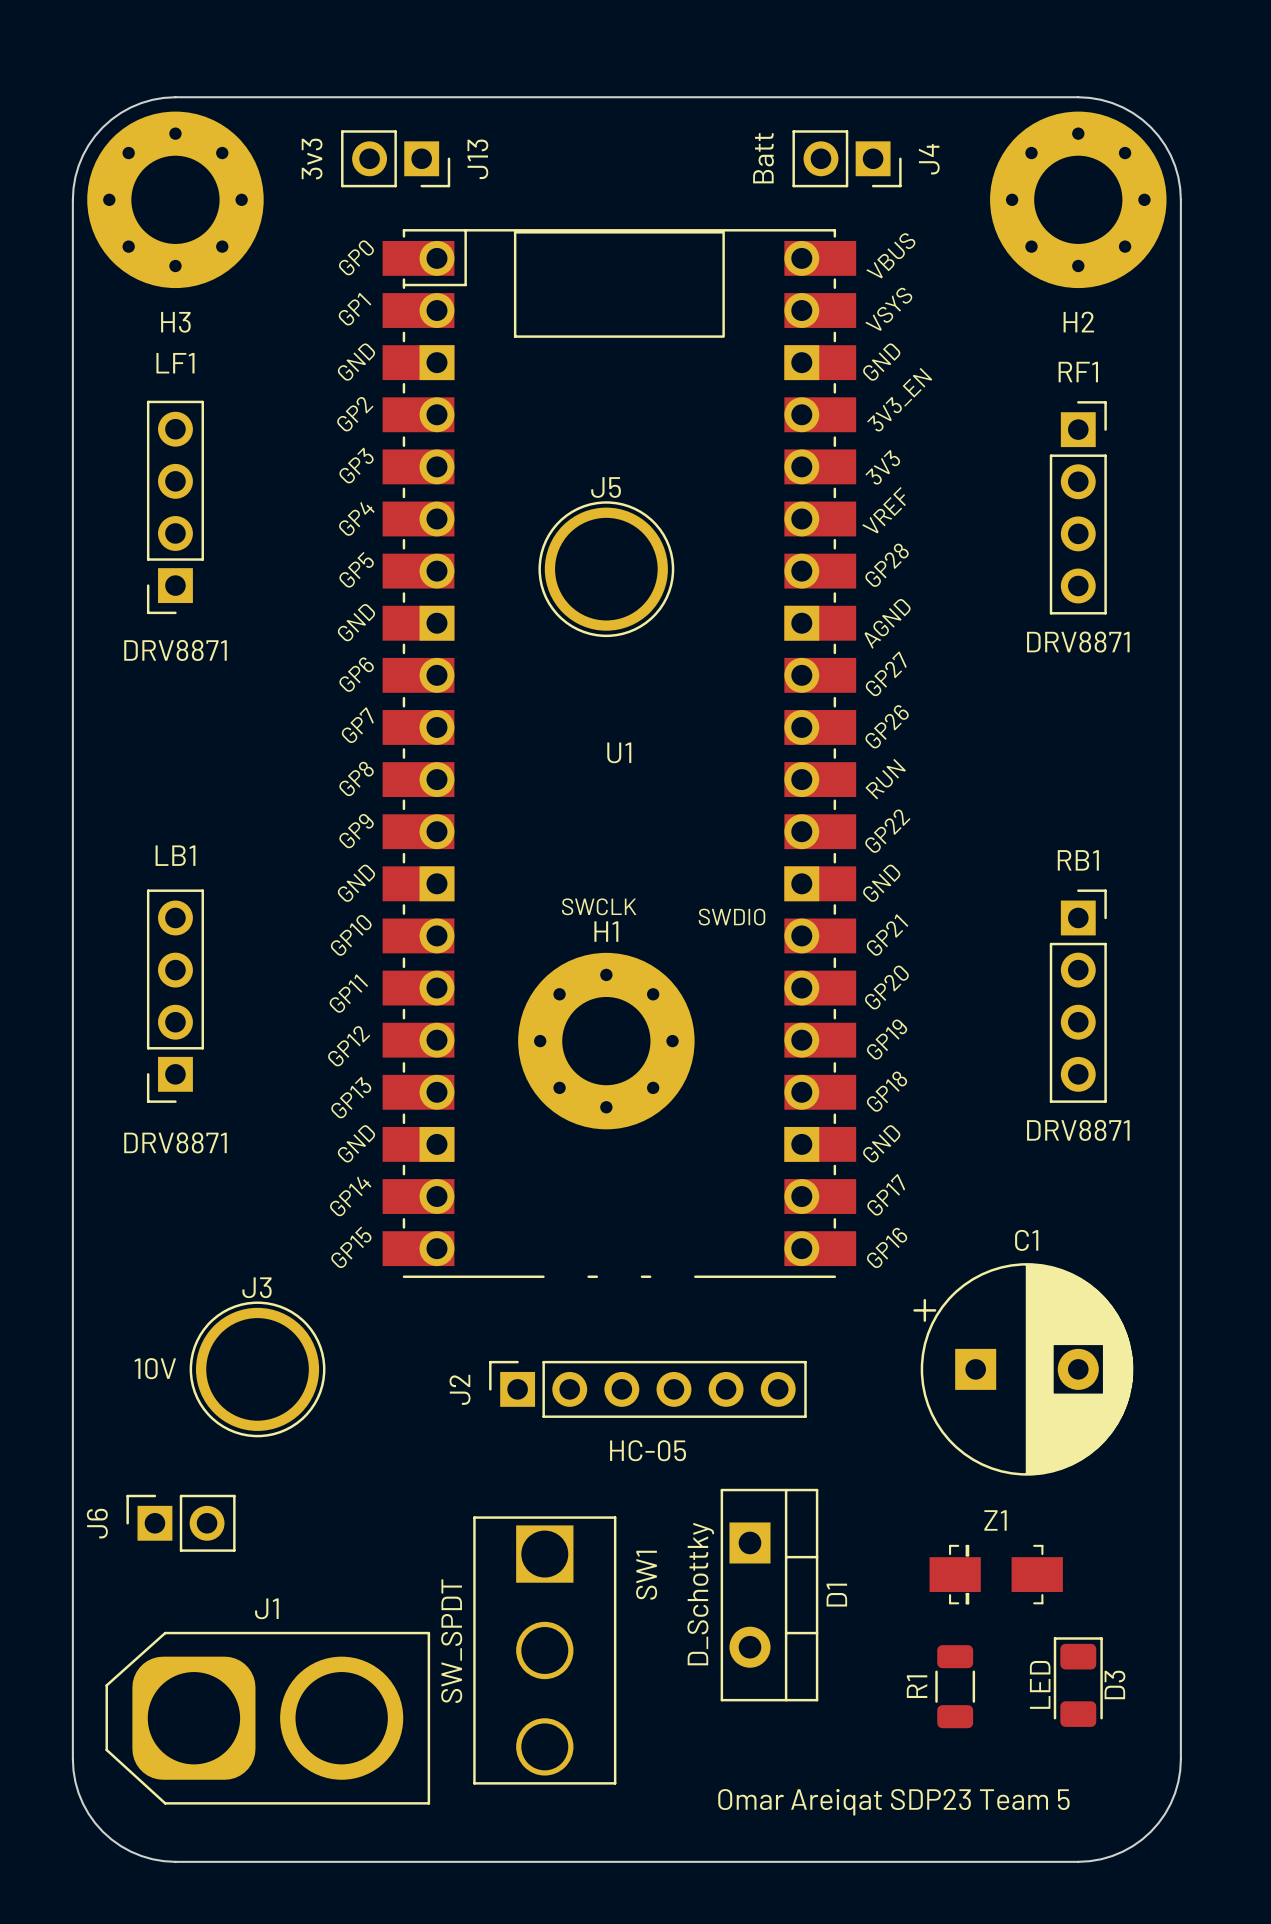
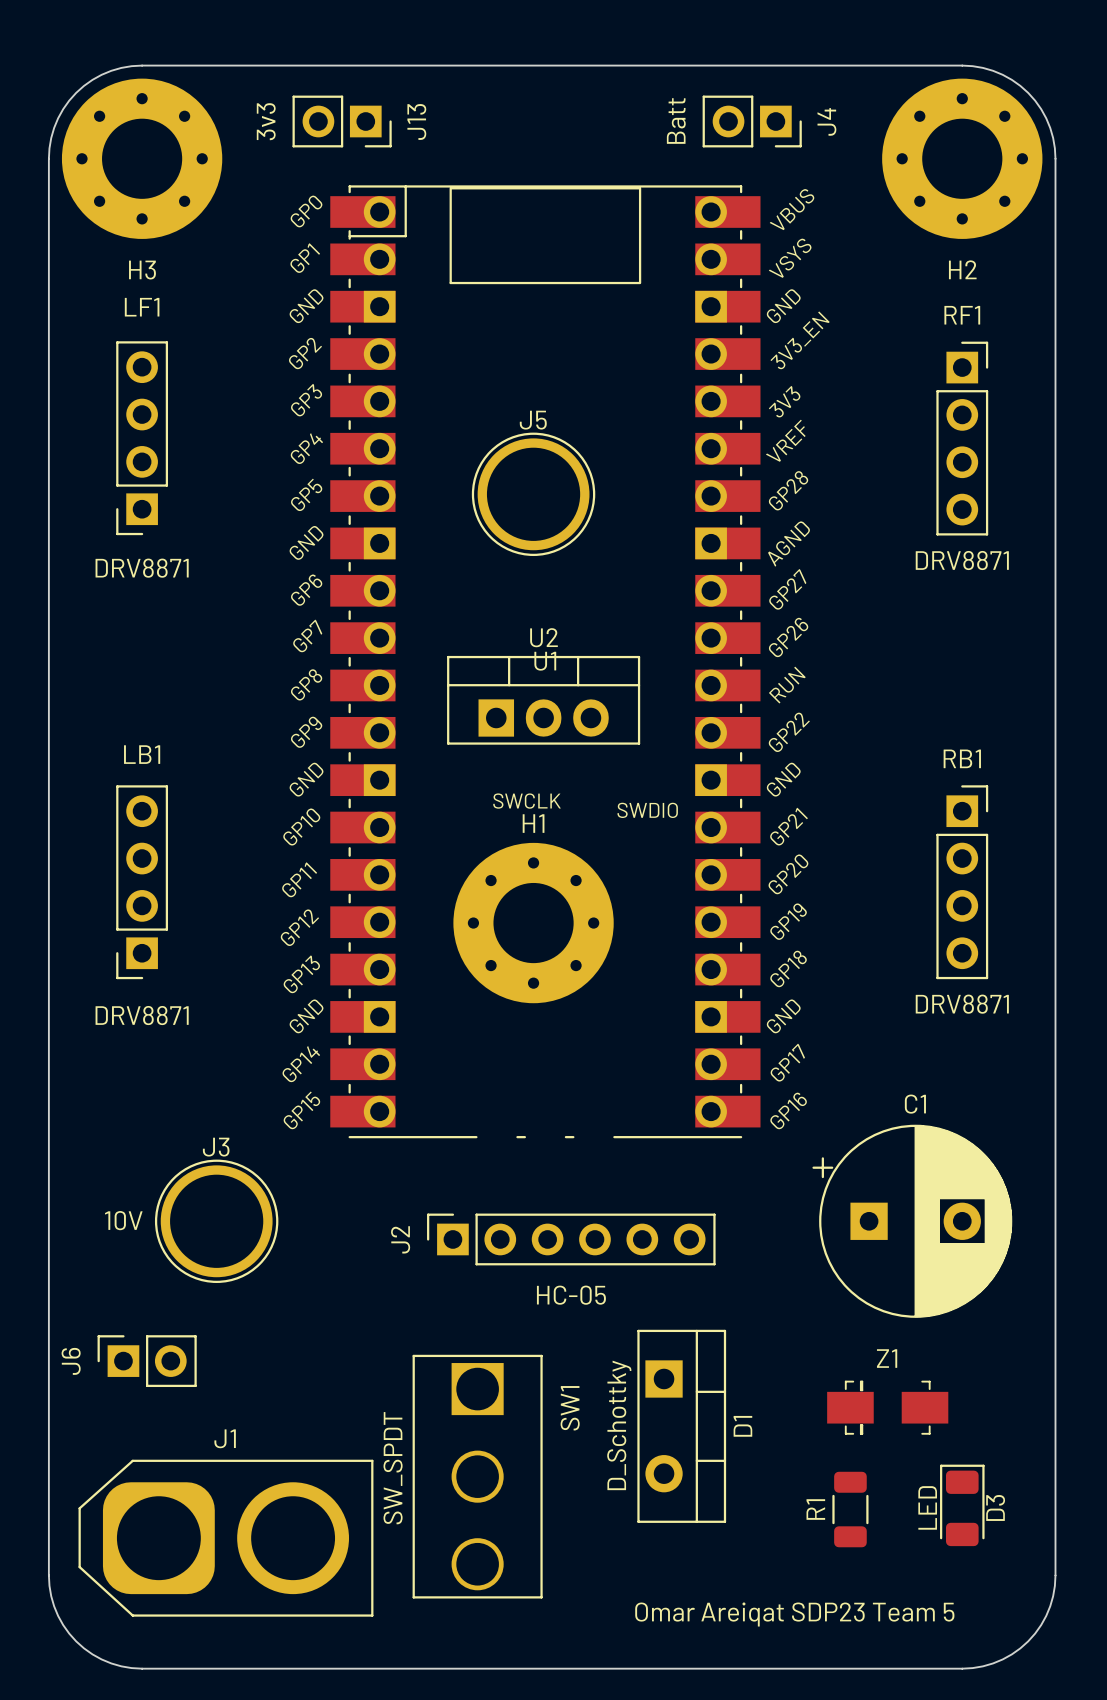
U2: none -> (543, 700)

